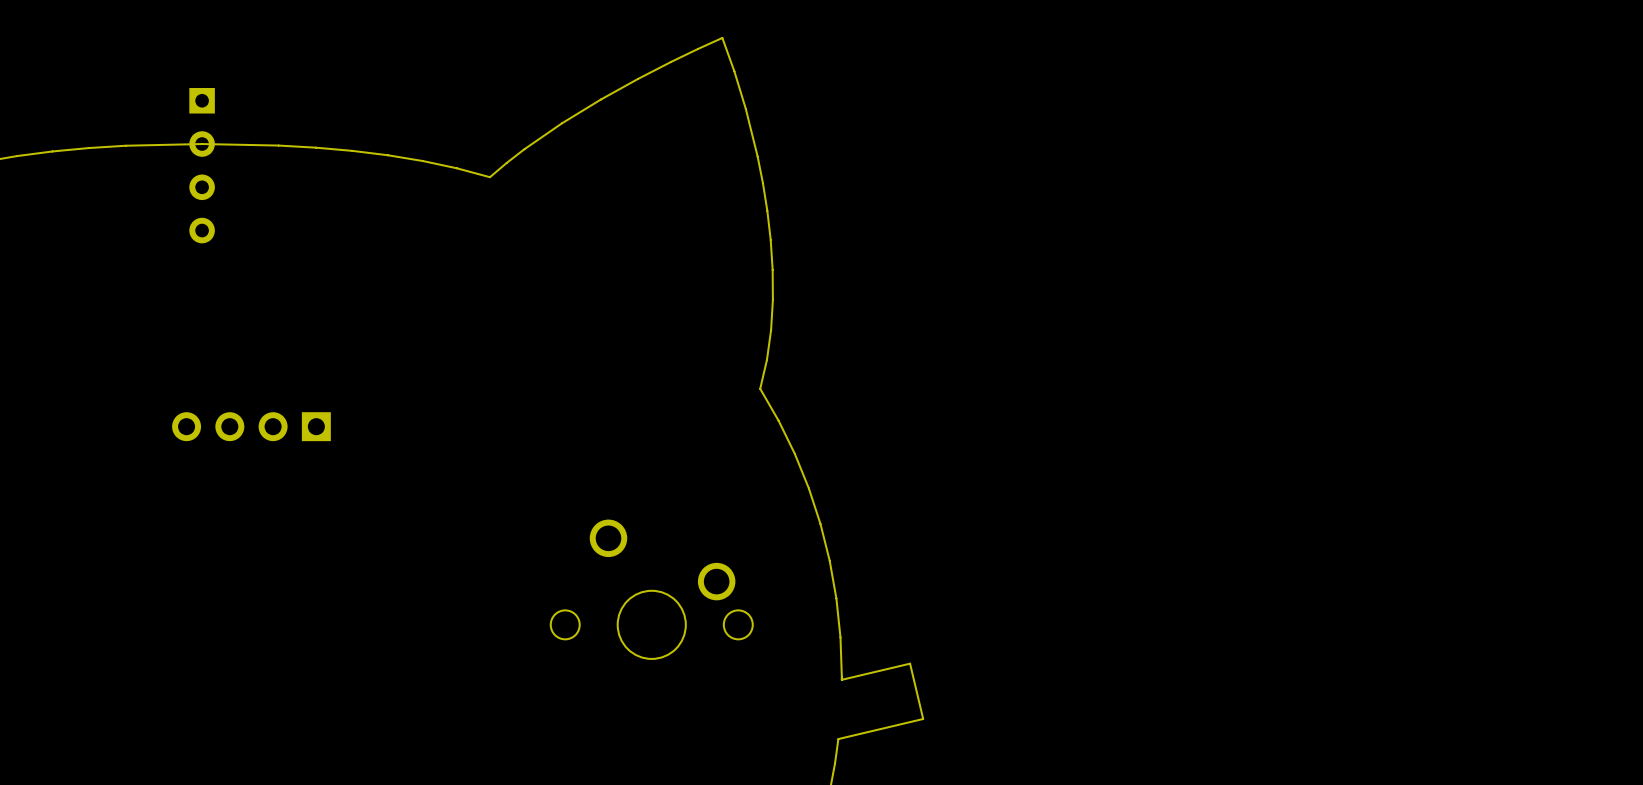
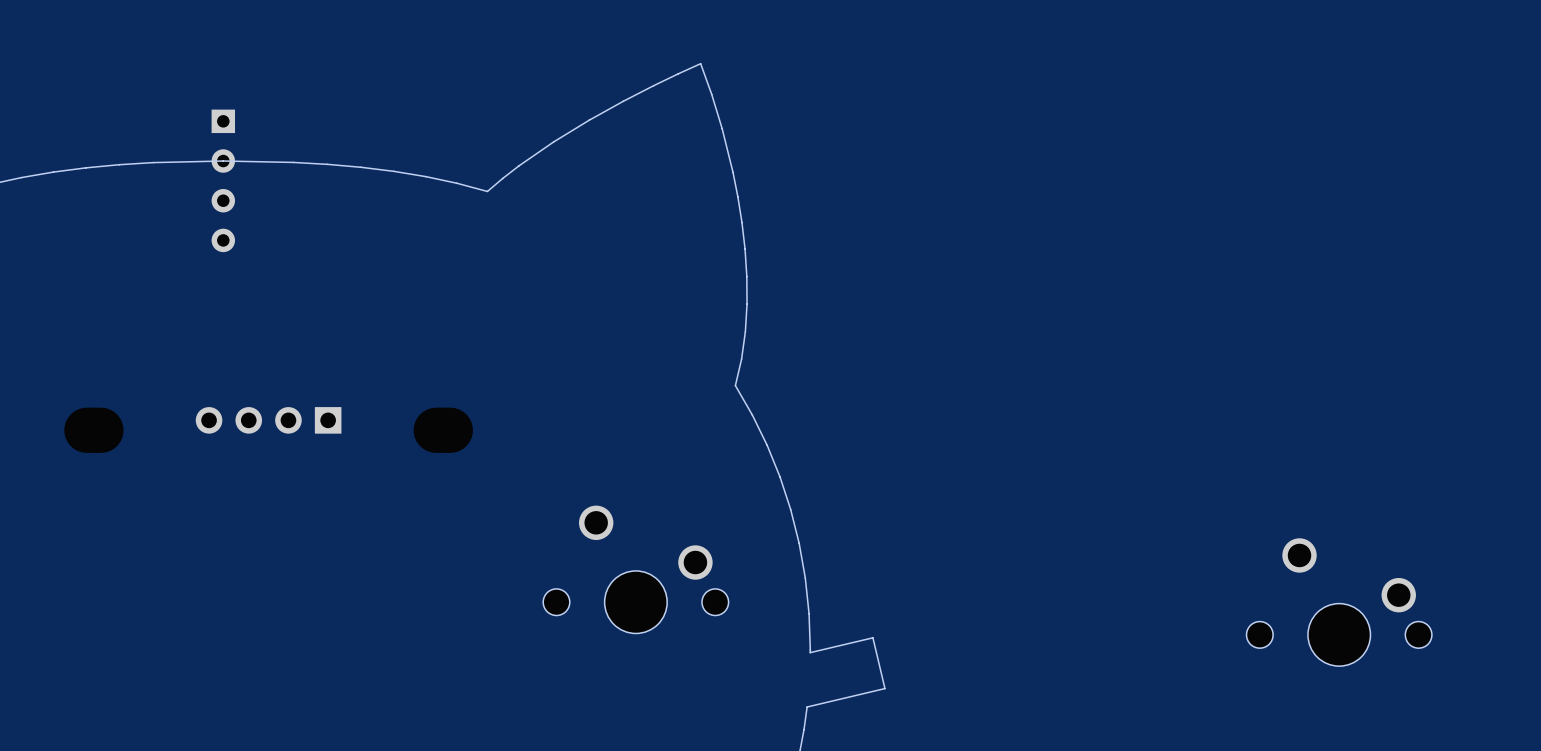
part: none -> (1339, 602)

